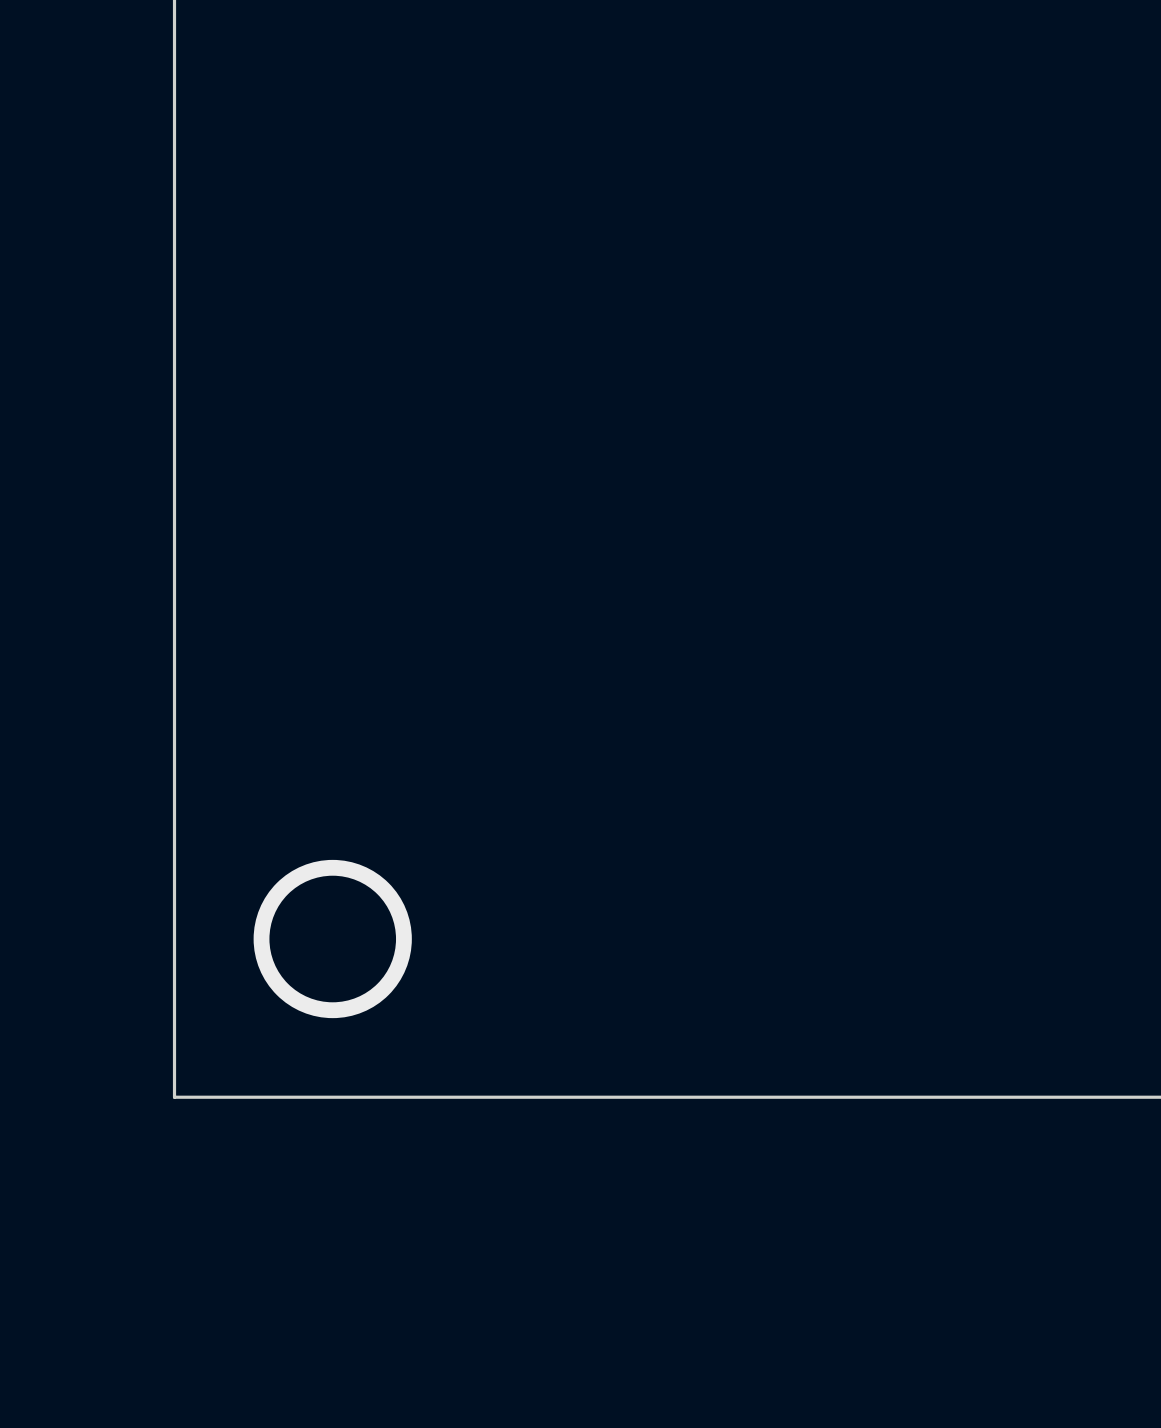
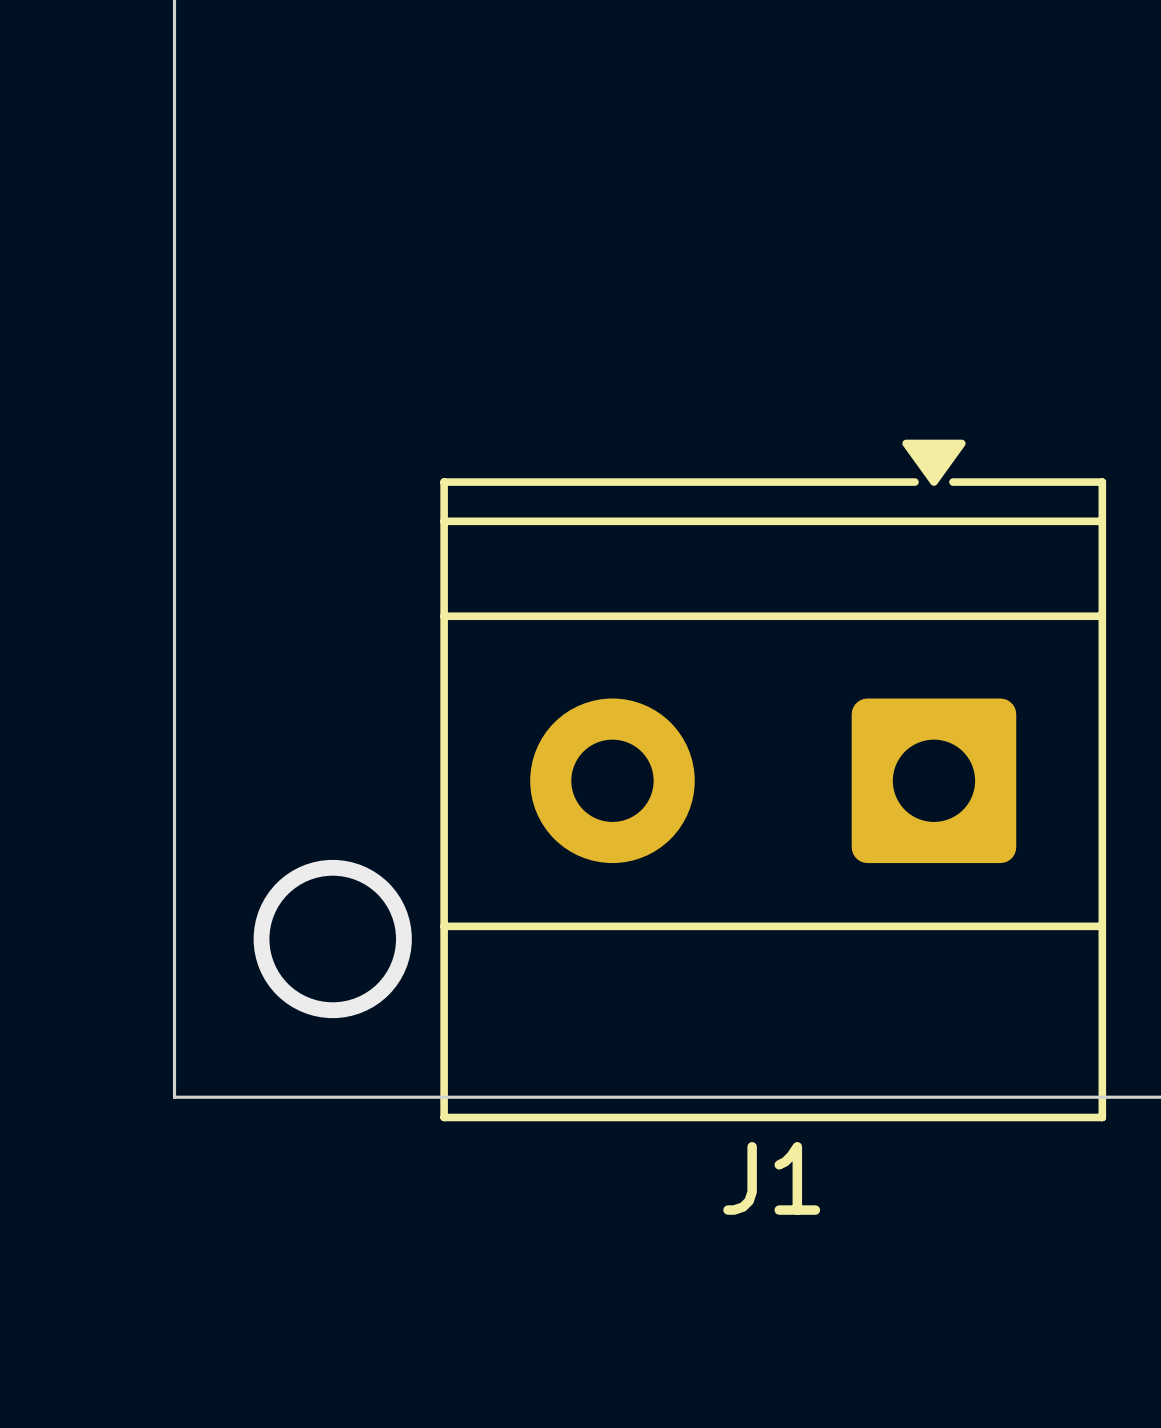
J1: none -> (773, 780)

